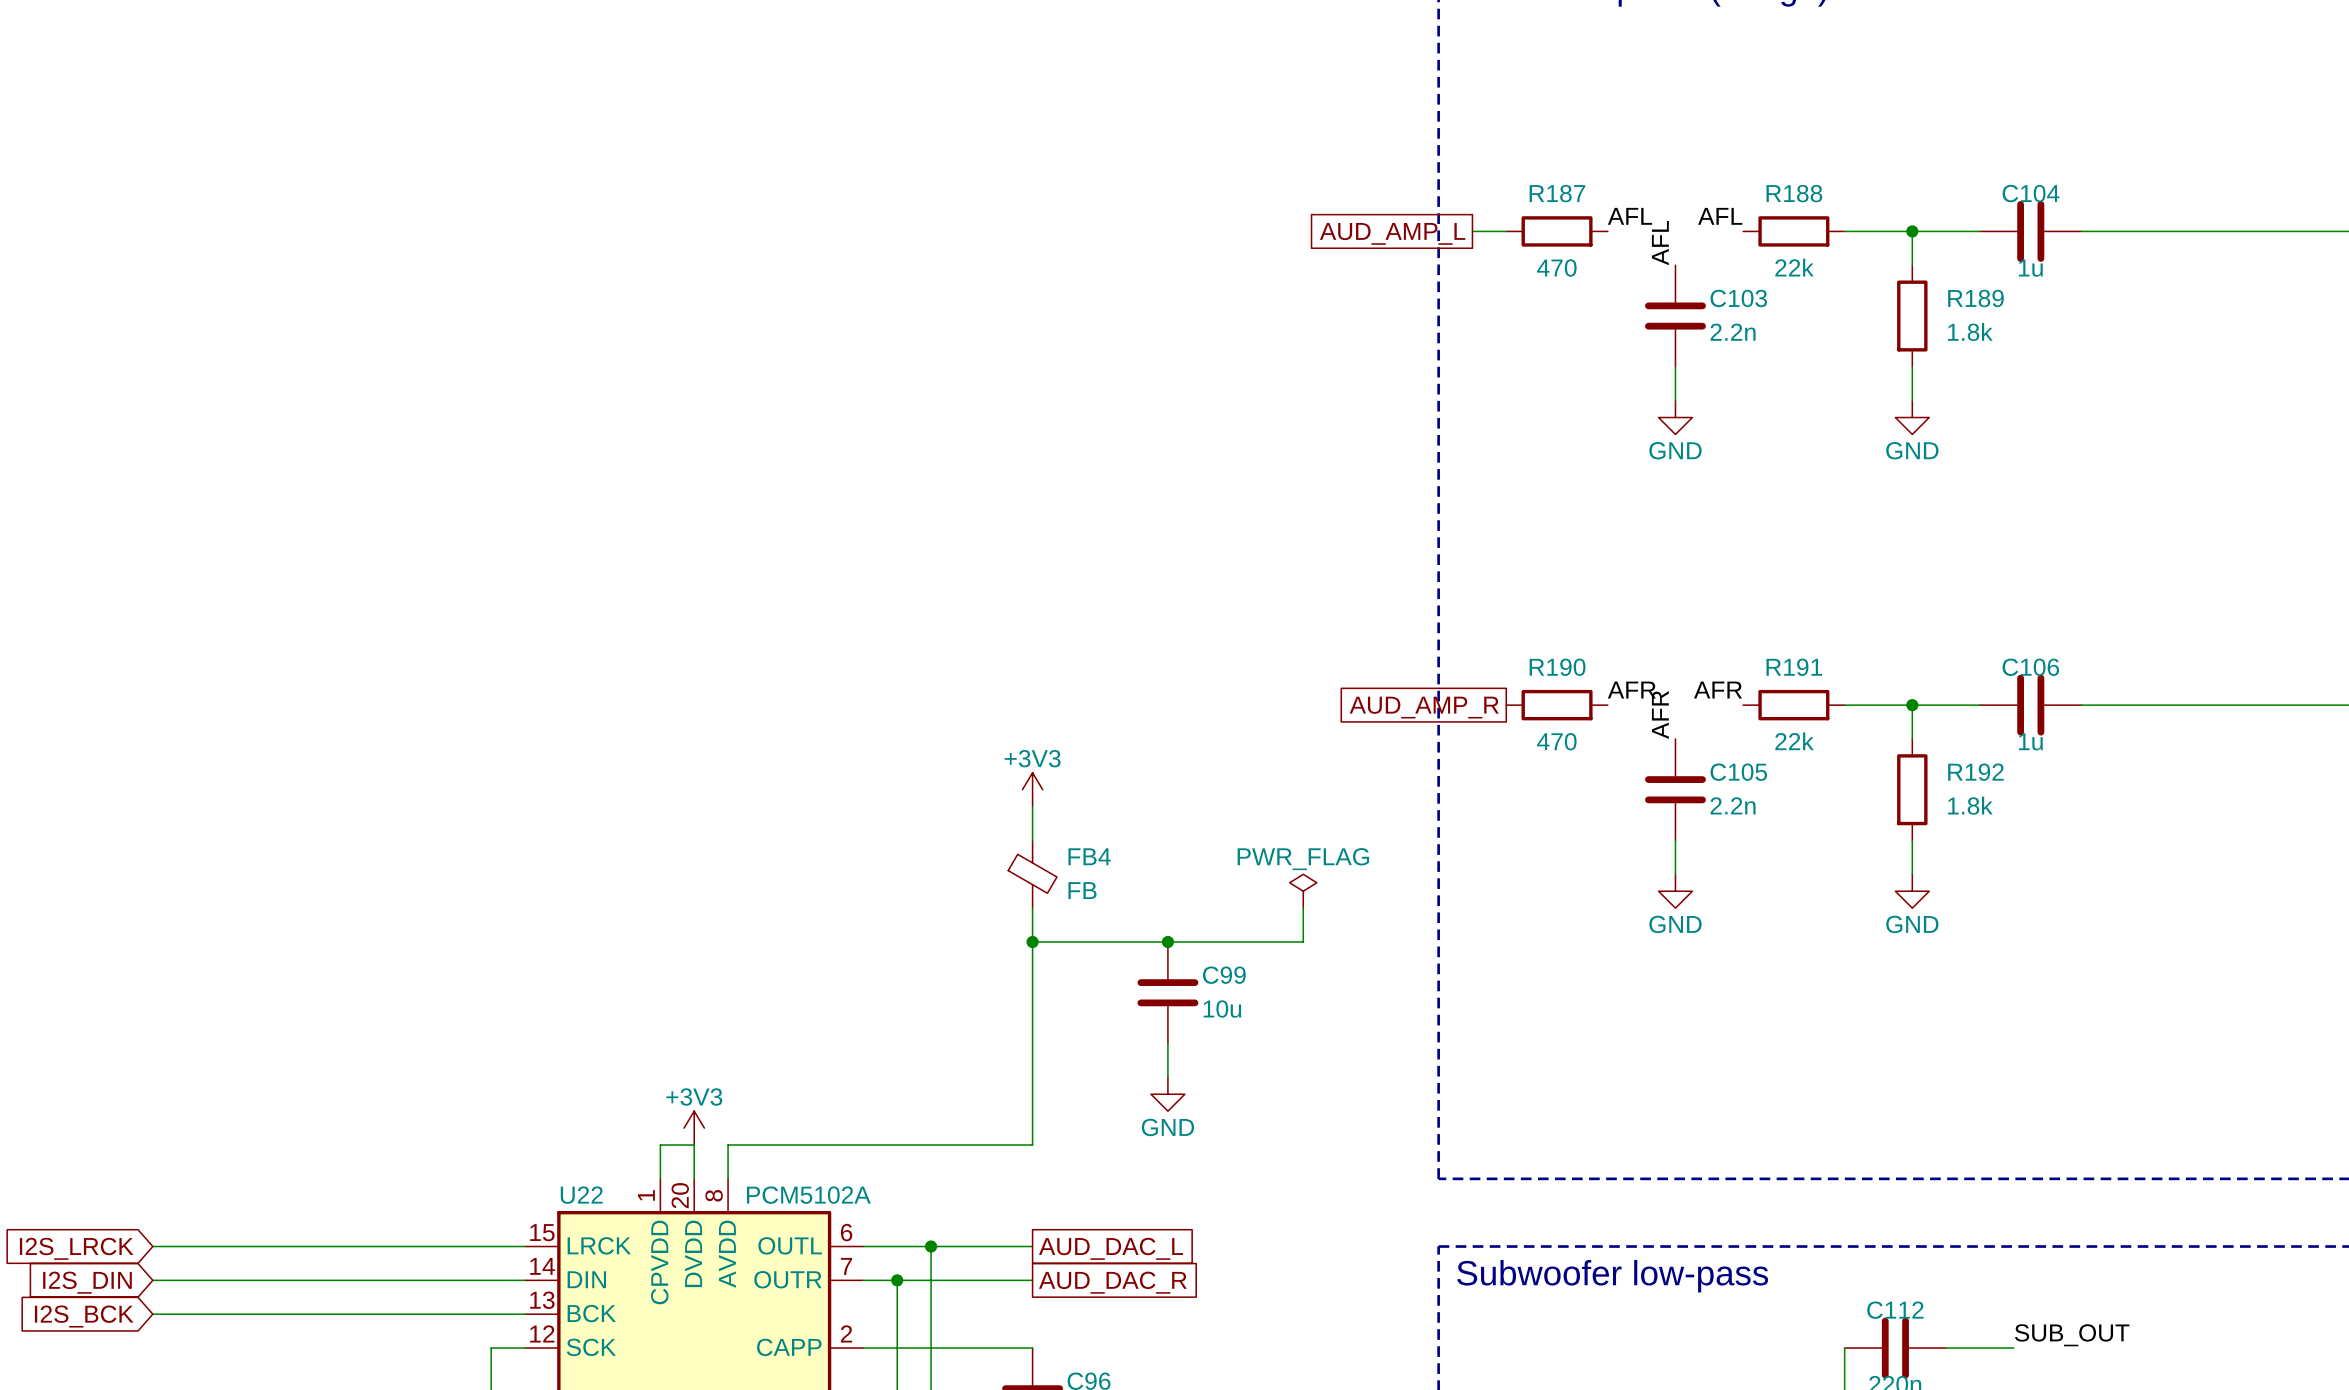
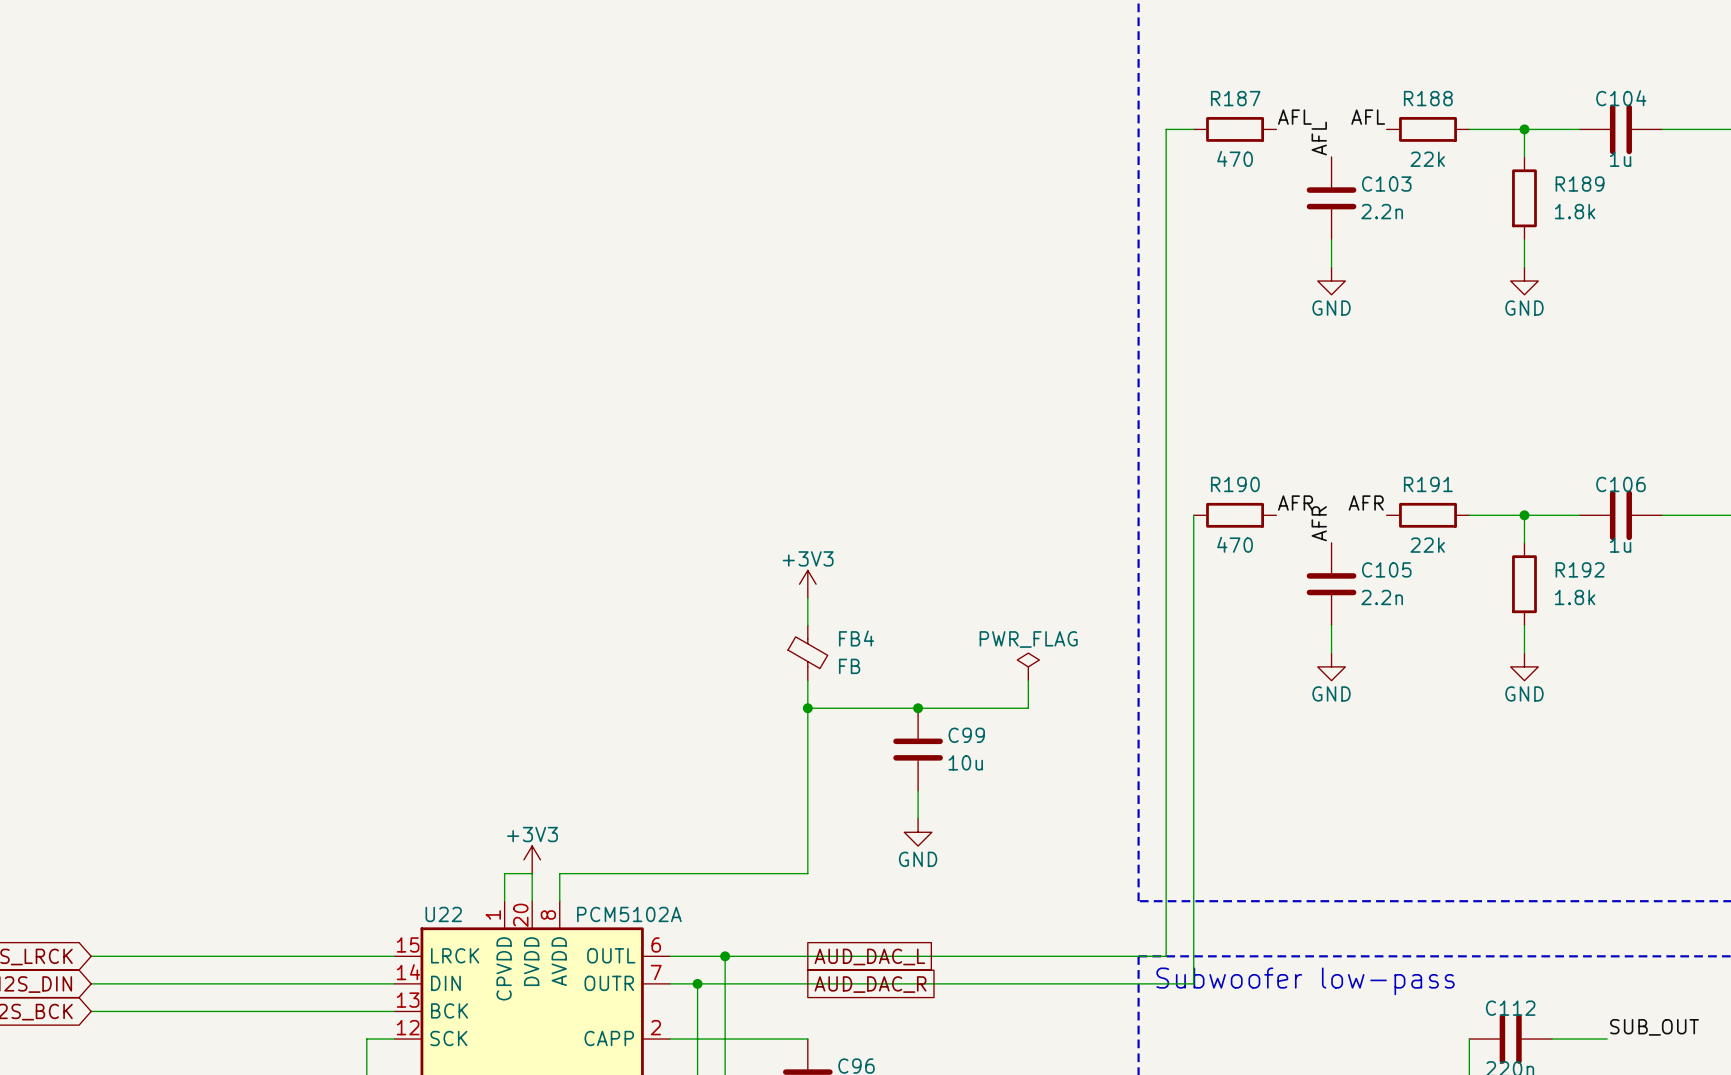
wire: none -> (1166, 129) (1166, 956) (807, 956)
global label: AUD_AMP_L (1392, 233) -> none
wire: none -> (1193, 515) (1193, 983) (807, 983)
global label: AUD_AMP_R (1424, 707) -> none

